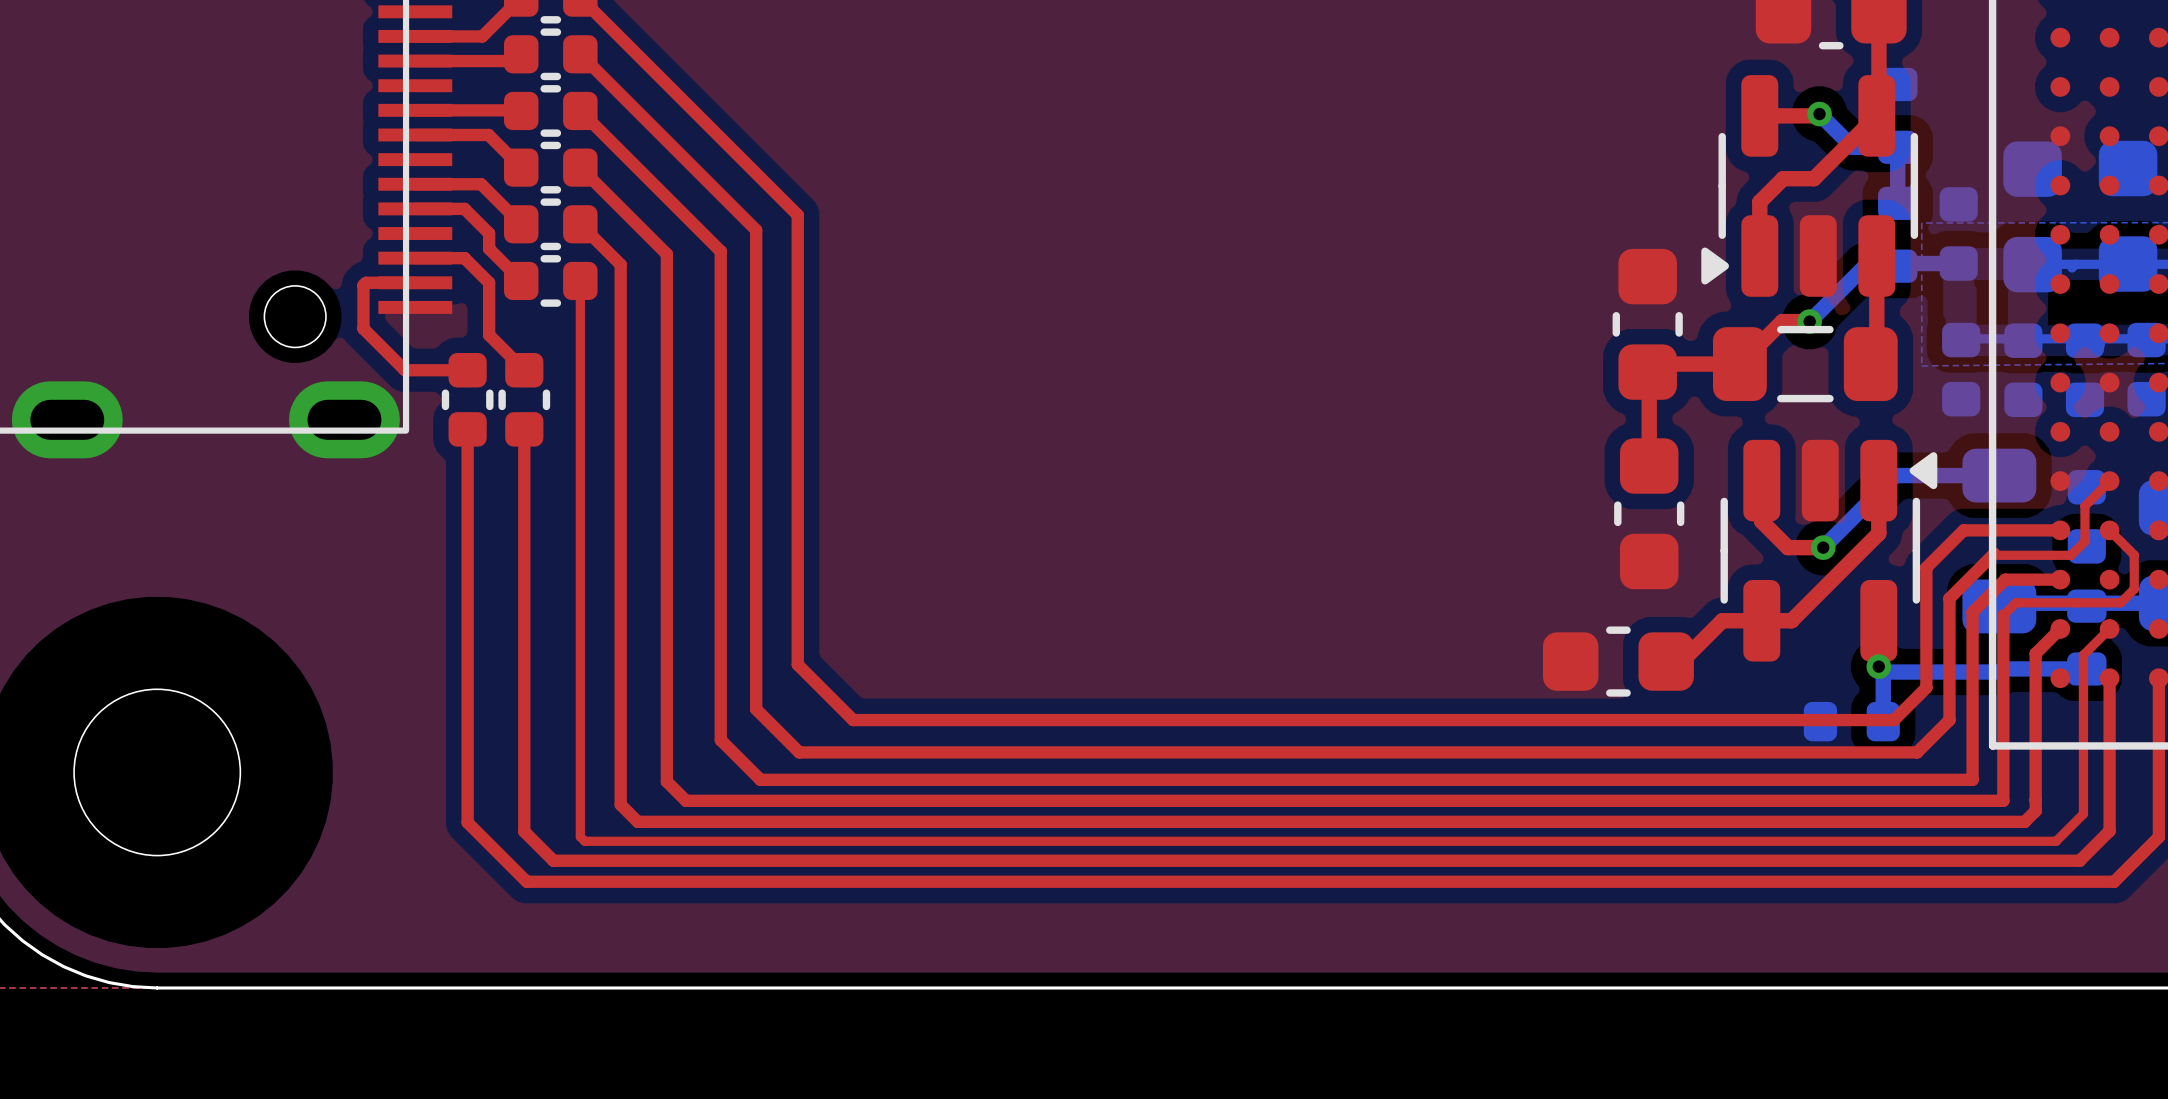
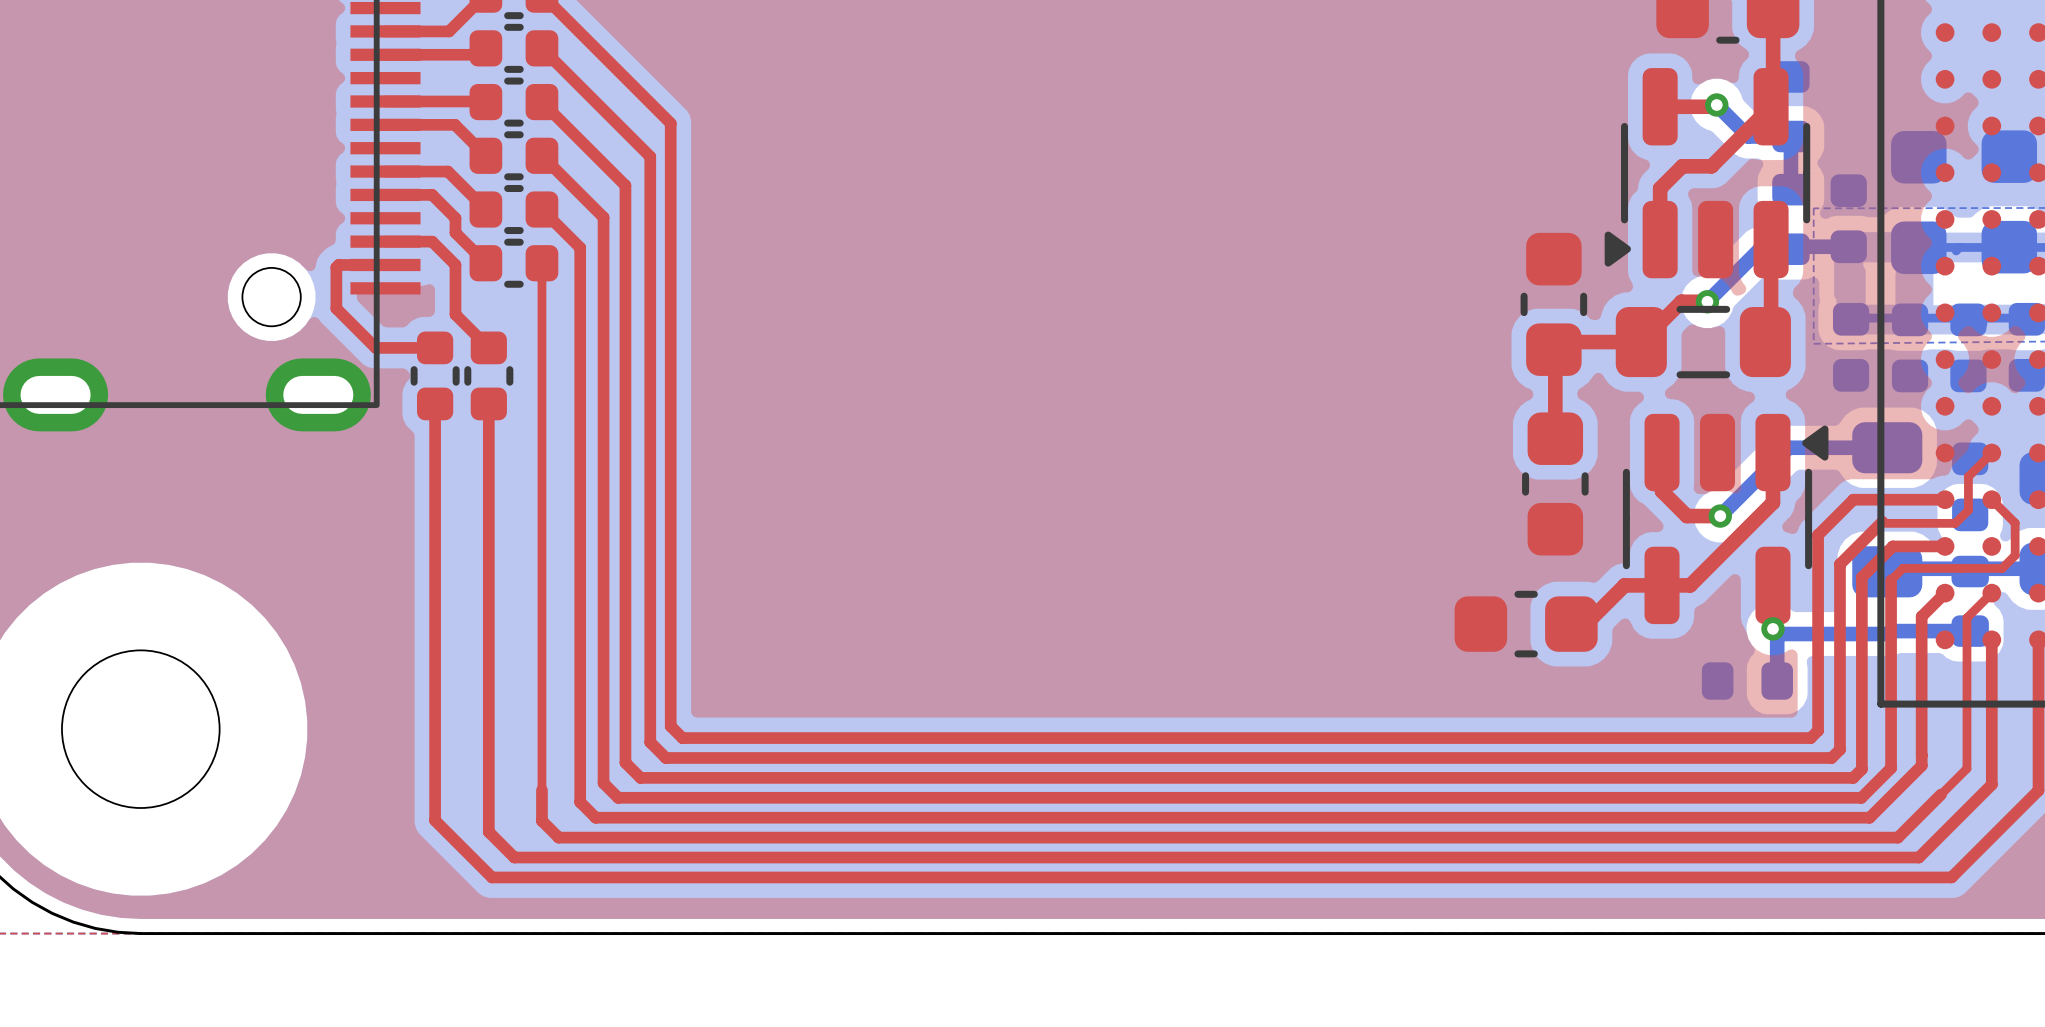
top track: (716, 133) (797, 215) (797, 664) (853, 720) (1894, 720) (1926, 687) -> (670, 123) (670, 726) (682, 738) (1810, 738) (1818, 730) (1818, 648)
top track: (694, 168) (756, 230) (756, 709) (799, 752) (1917, 752) (1949, 720) -> (650, 156) (650, 742) (665, 757) (1831, 757) (1839, 749) (1839, 679)
top track: (668, 199) (720, 251) (720, 740) (760, 779) (1972, 779) -> (625, 185) (625, 762) (640, 777) (1853, 777) (1861, 769) (1861, 736)
top track: (645, 232) (666, 254) (666, 781) (686, 800) (2003, 800) -> (603, 217) (603, 783) (618, 797) (1861, 797) (1891, 768) (1891, 756)
top track: (620, 804) (637, 821) (2024, 821) -> (580, 759) (580, 802) (595, 817) (1869, 817) (1911, 776)
top track: (467, 822) (526, 881) (2114, 881) -> (435, 776) (435, 820) (491, 877) (1951, 877) (1996, 832)
top track: (524, 831) (553, 860) (2079, 860) -> (488, 785) (488, 831) (514, 857) (1918, 857) (1963, 812)
top track: (580, 836) (584, 841) (2056, 841) -> (541, 790) (541, 820) (558, 837) (1897, 837) (1941, 794)

